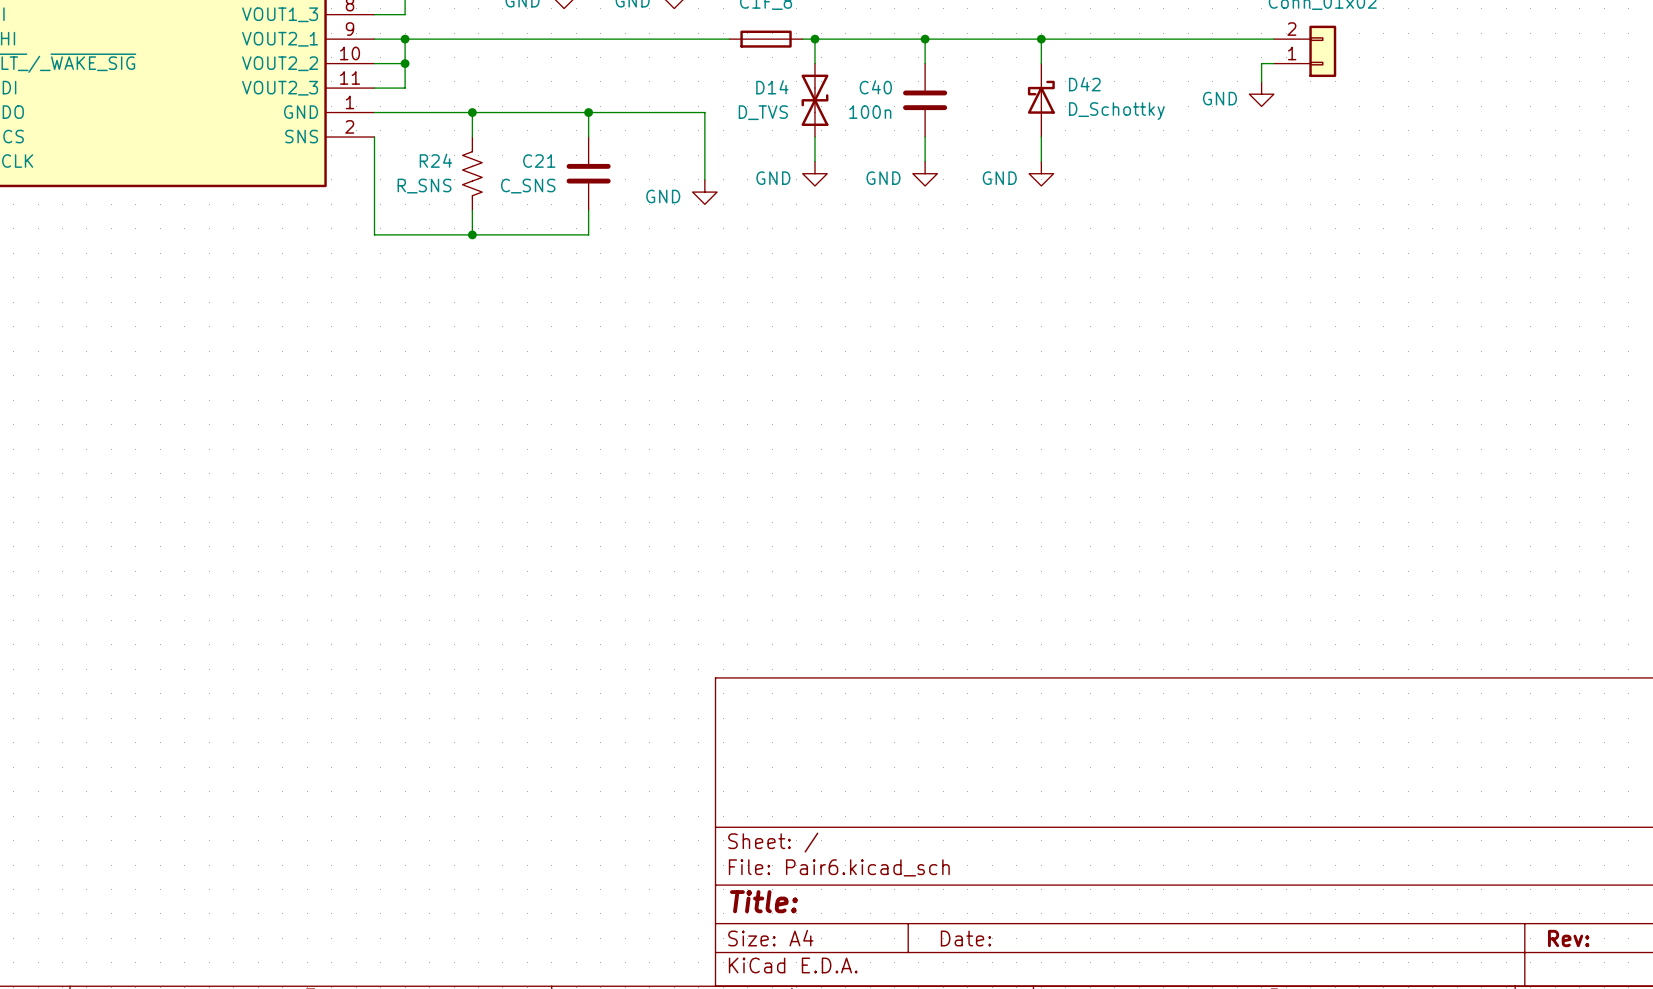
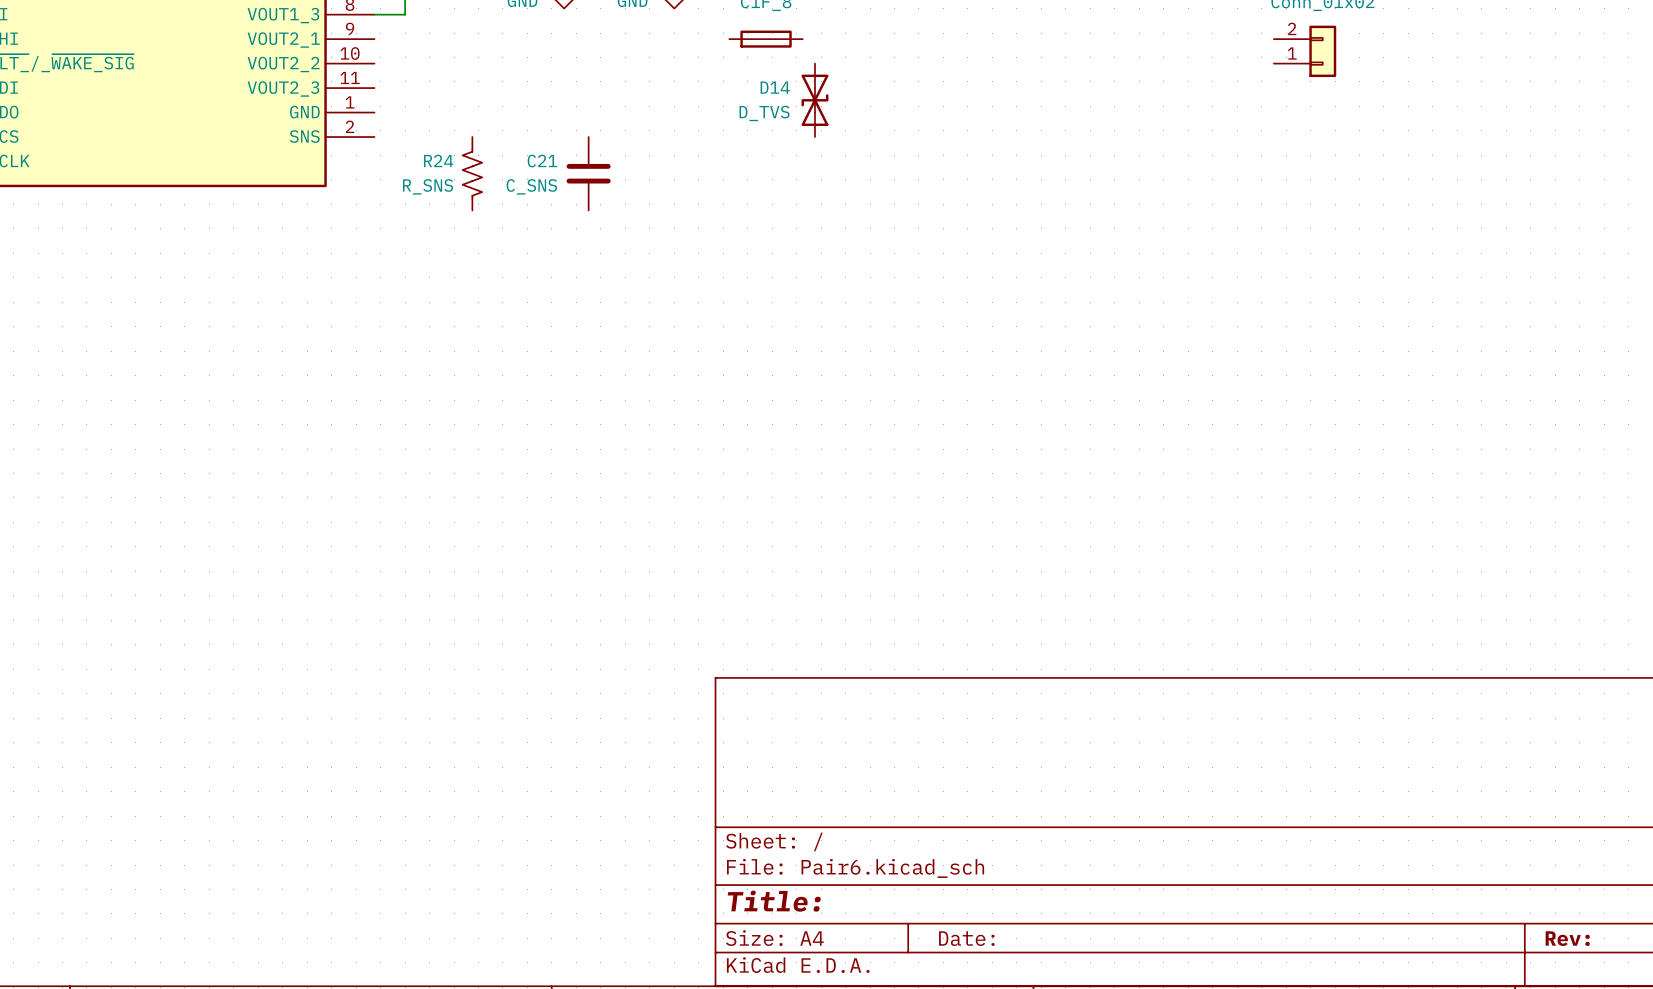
wire: (374, 39) (729, 39) -> none
wire: (405, 39) (405, 88) (374, 88) -> none
junction: (405, 39) -> none
wire: (802, 39) (1273, 39) -> none
wire: (814, 39) (814, 63) -> none
junction: (814, 39) -> none
wire: (925, 39) (925, 63) -> none
junction: (925, 39) -> none
wire: (1041, 39) (1041, 63) -> none
junction: (1041, 39) -> none
wire: (374, 63) (405, 63) -> none
junction: (405, 63) -> none
wire: (1273, 63) (1261, 63) (1261, 81) -> none
power symbol: GND (1261, 94) -> none
C40: 100n (925, 100) -> none
D42: D_Schottky (1041, 100) -> none
wire: (374, 112) (704, 112) (704, 179) -> none
wire: (472, 112) (472, 137) -> none
junction: (472, 112) -> none
wire: (588, 112) (588, 137) -> none
junction: (588, 112) -> none
wire: (374, 137) (374, 234) (588, 234) (588, 210) -> none
wire: (814, 137) (814, 161) -> none
wire: (925, 137) (925, 161) -> none
wire: (1041, 137) (1041, 161) -> none
power symbol: GND (814, 173) -> none
power symbol: GND (925, 173) -> none
power symbol: GND (1041, 173) -> none
power symbol: GND (704, 192) -> none
wire: (472, 210) (472, 234) -> none
junction: (472, 234) -> none

